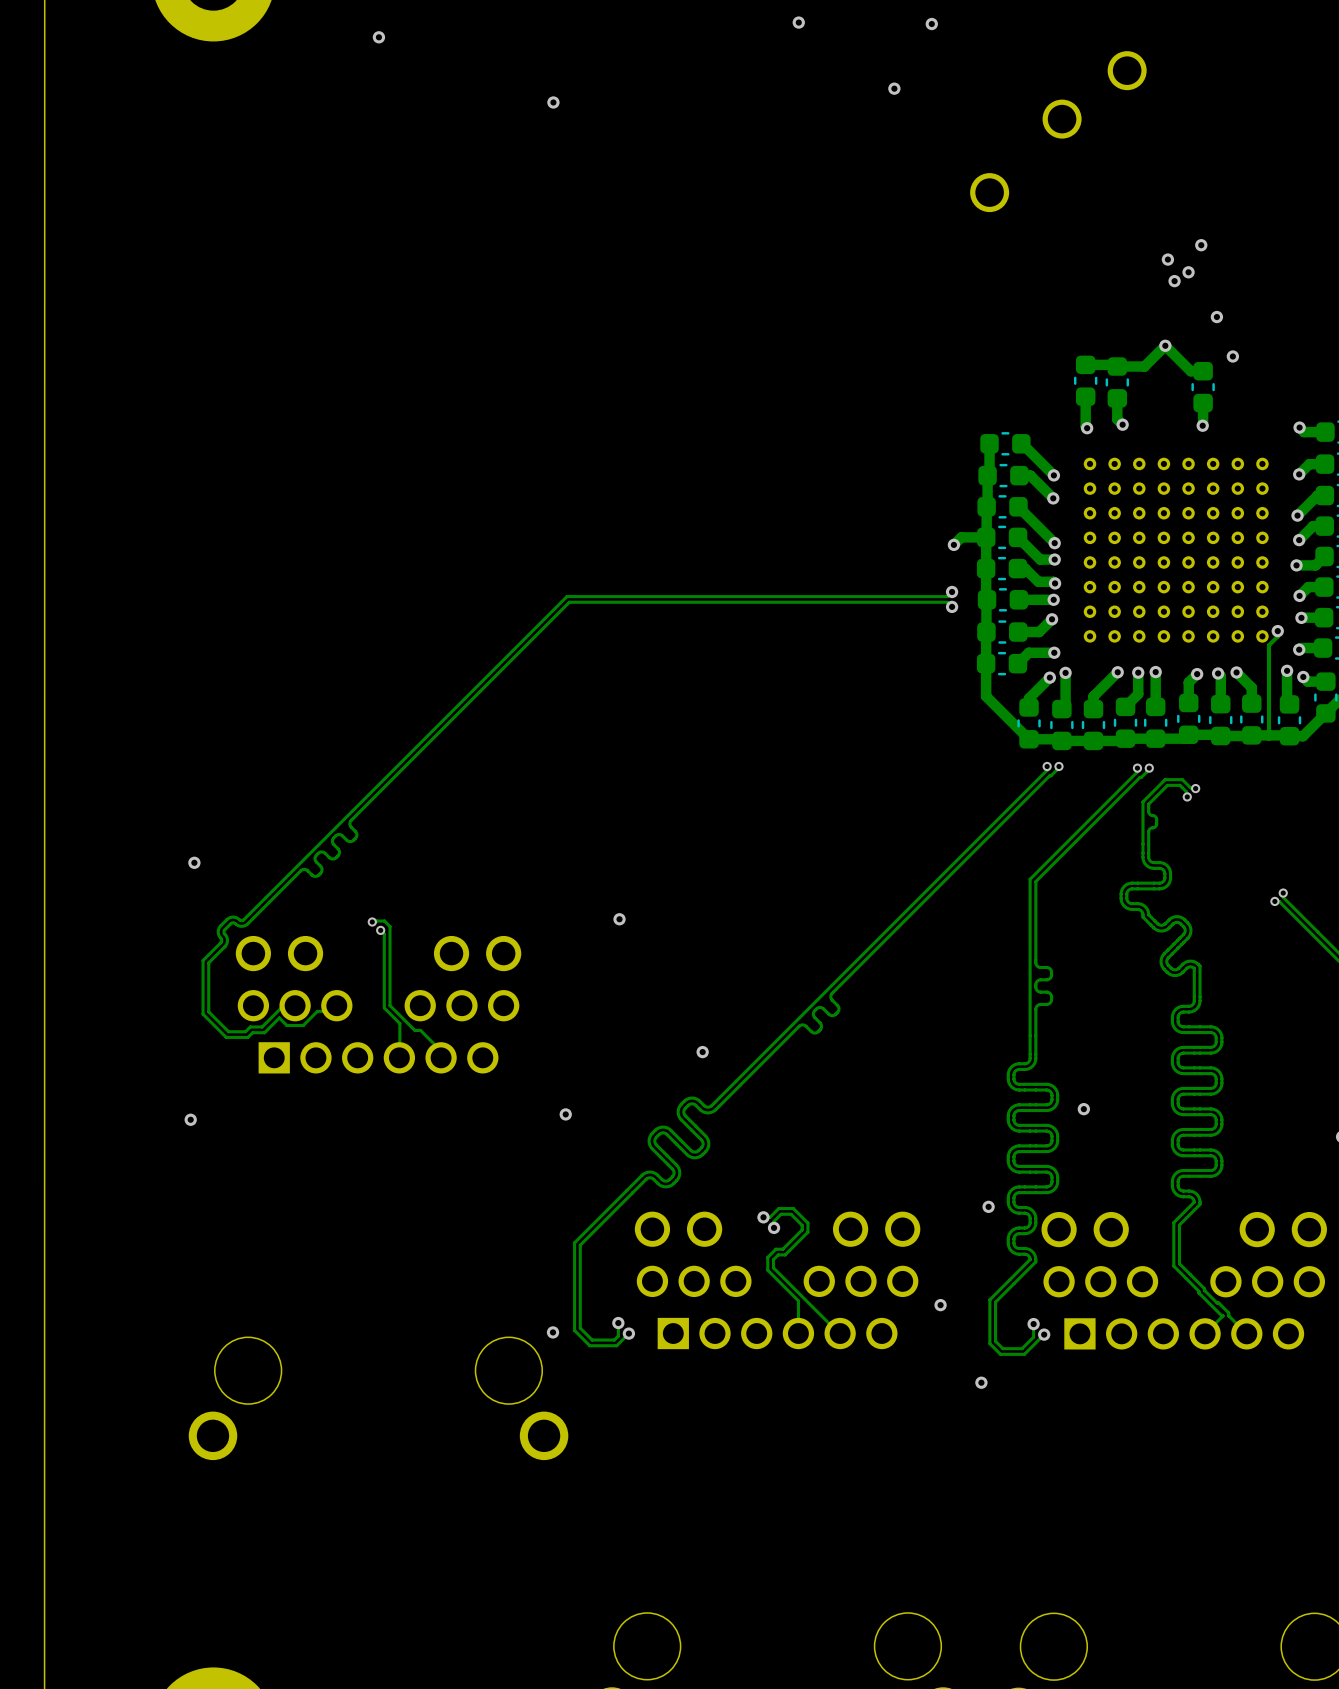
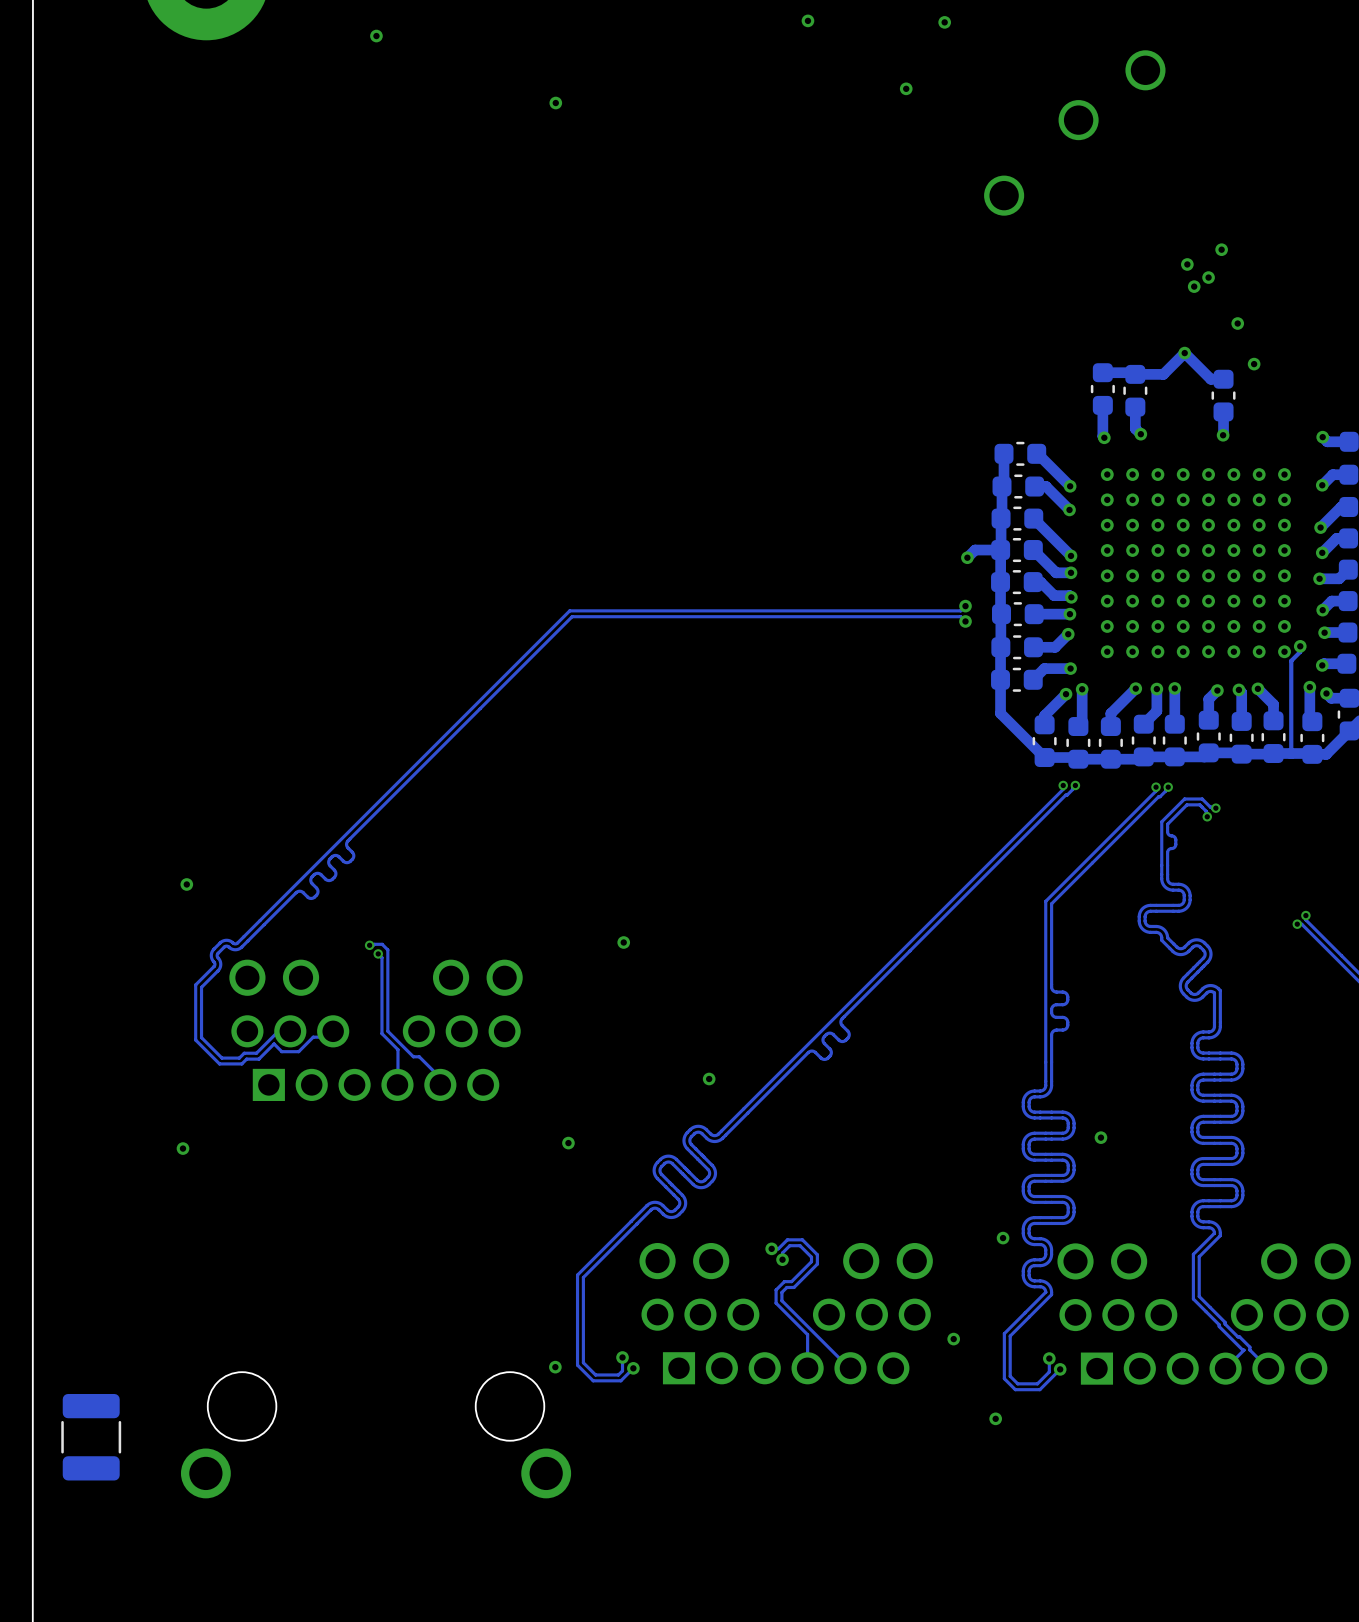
part: none -> (91, 1437)

